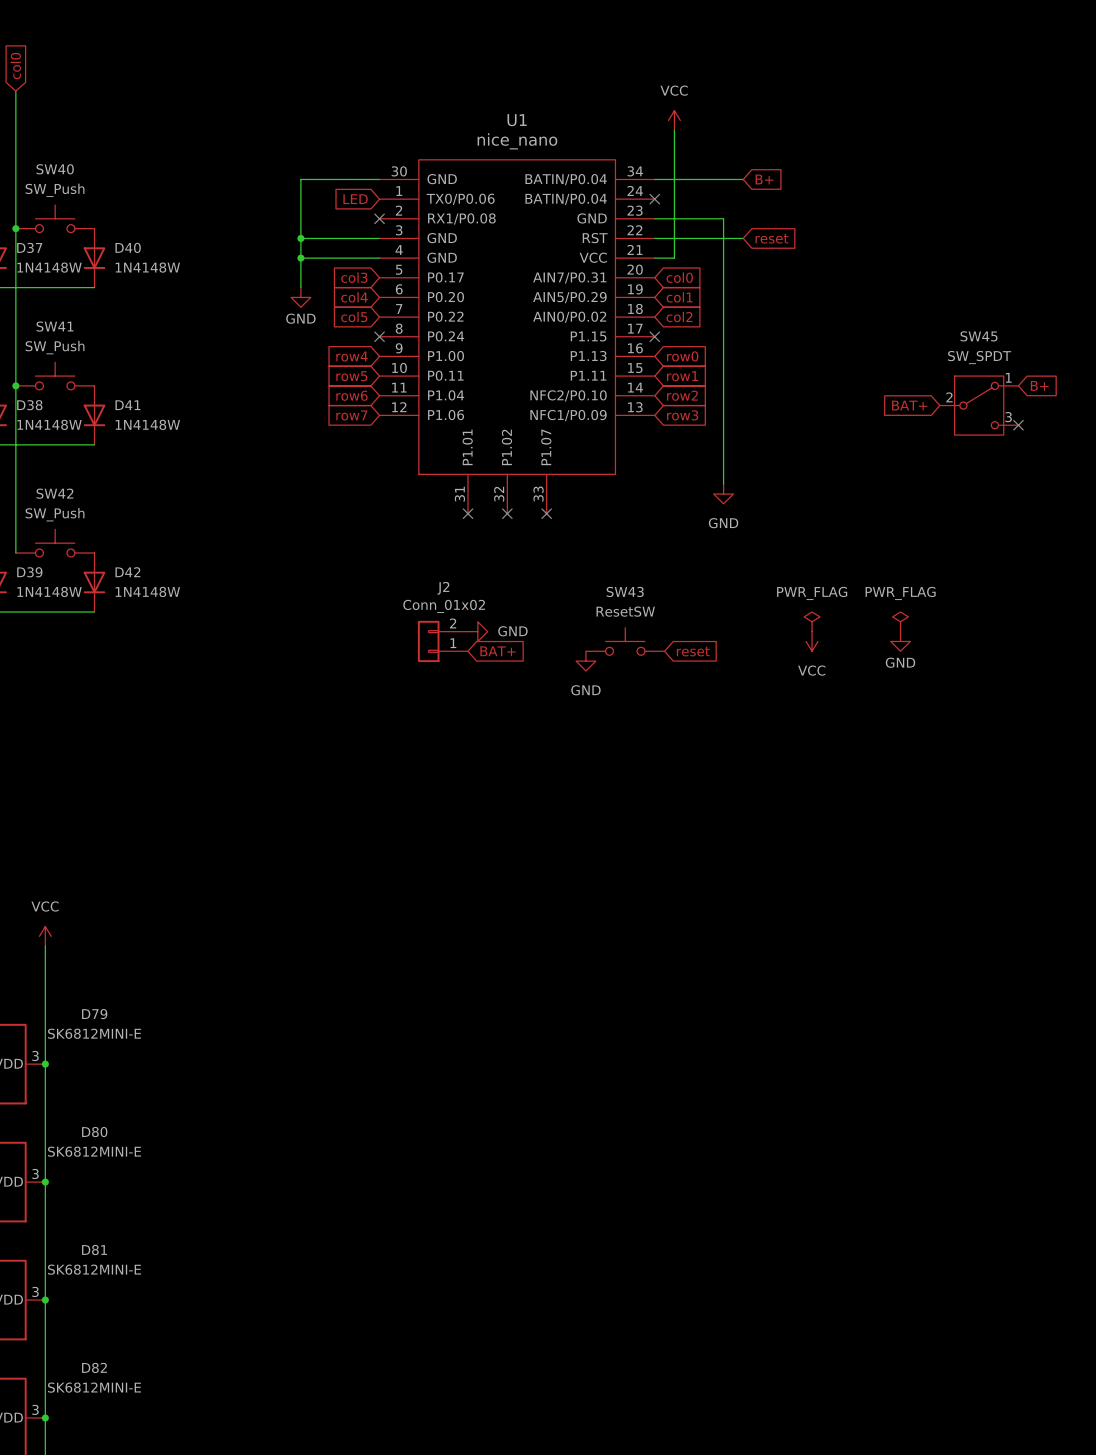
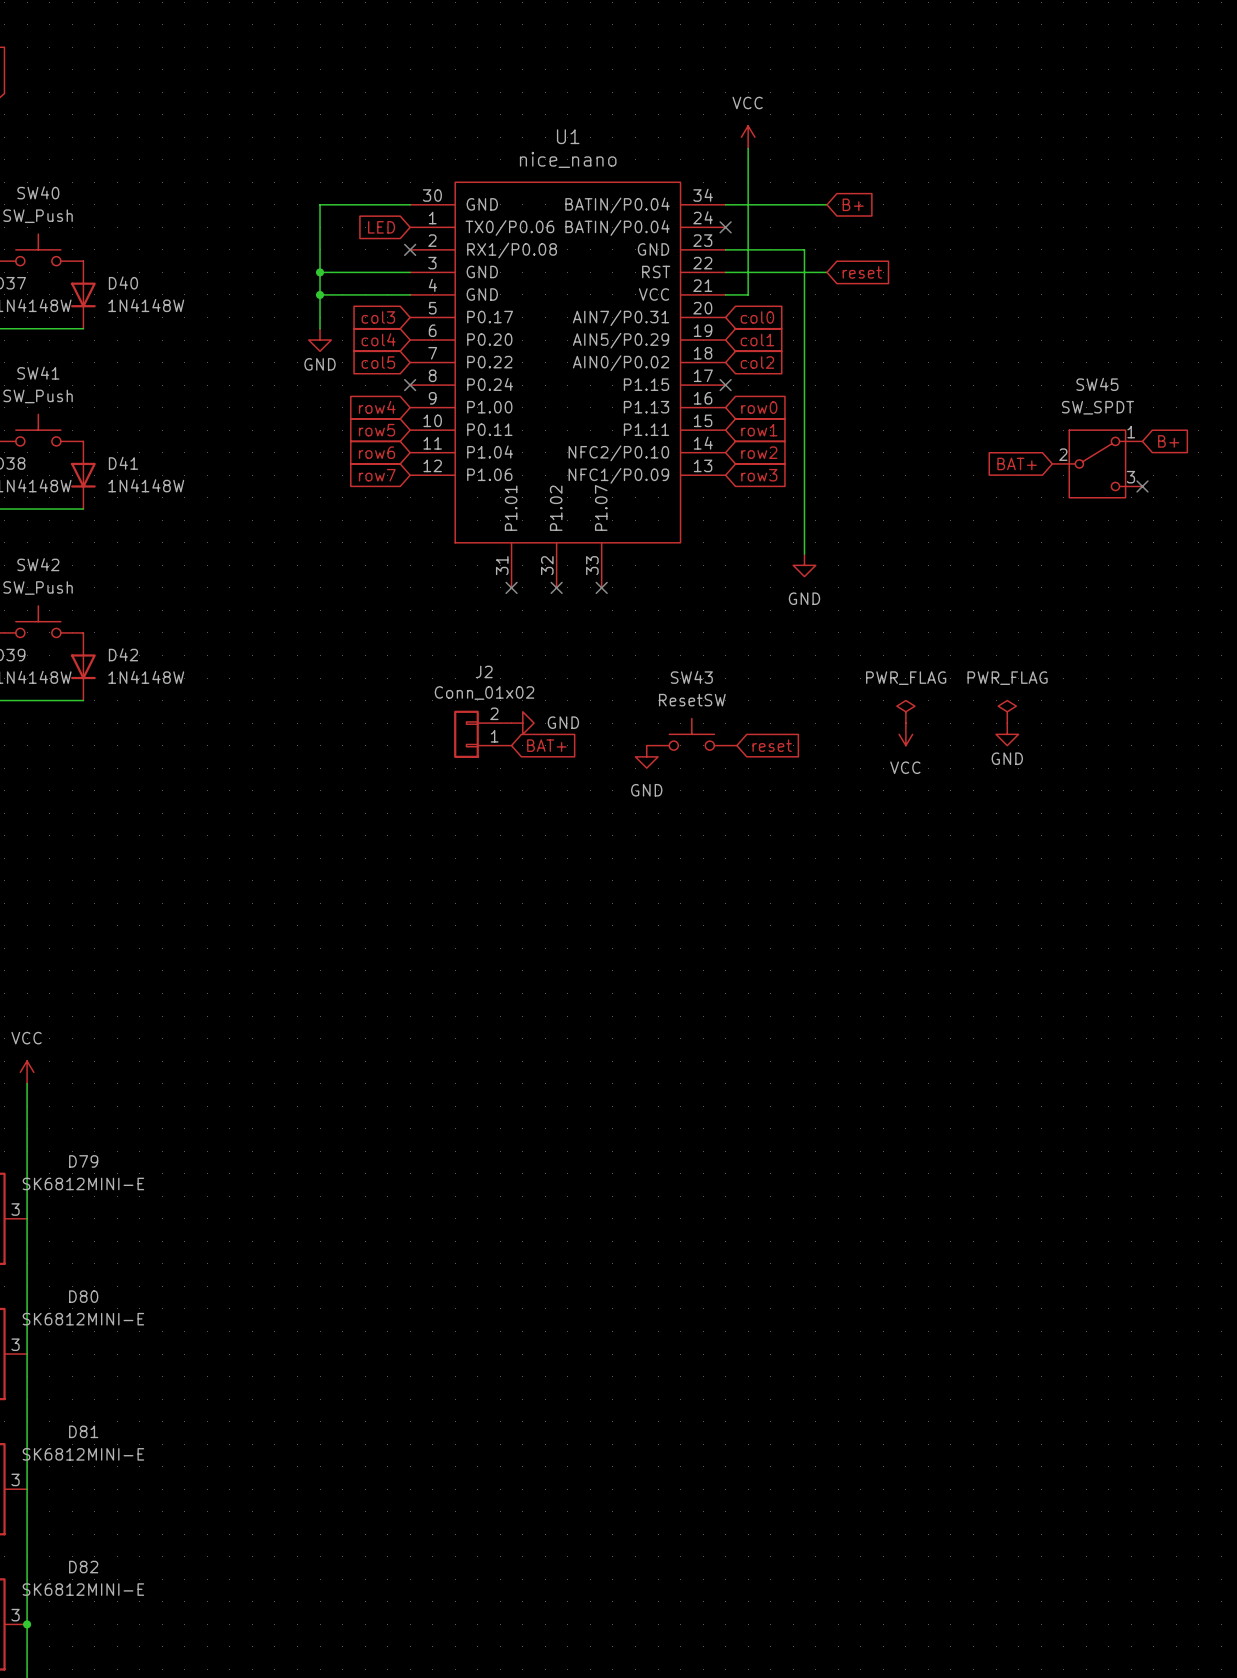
junction: (45, 1064) -> none
junction: (45, 1182) -> none
junction: (45, 1300) -> none

